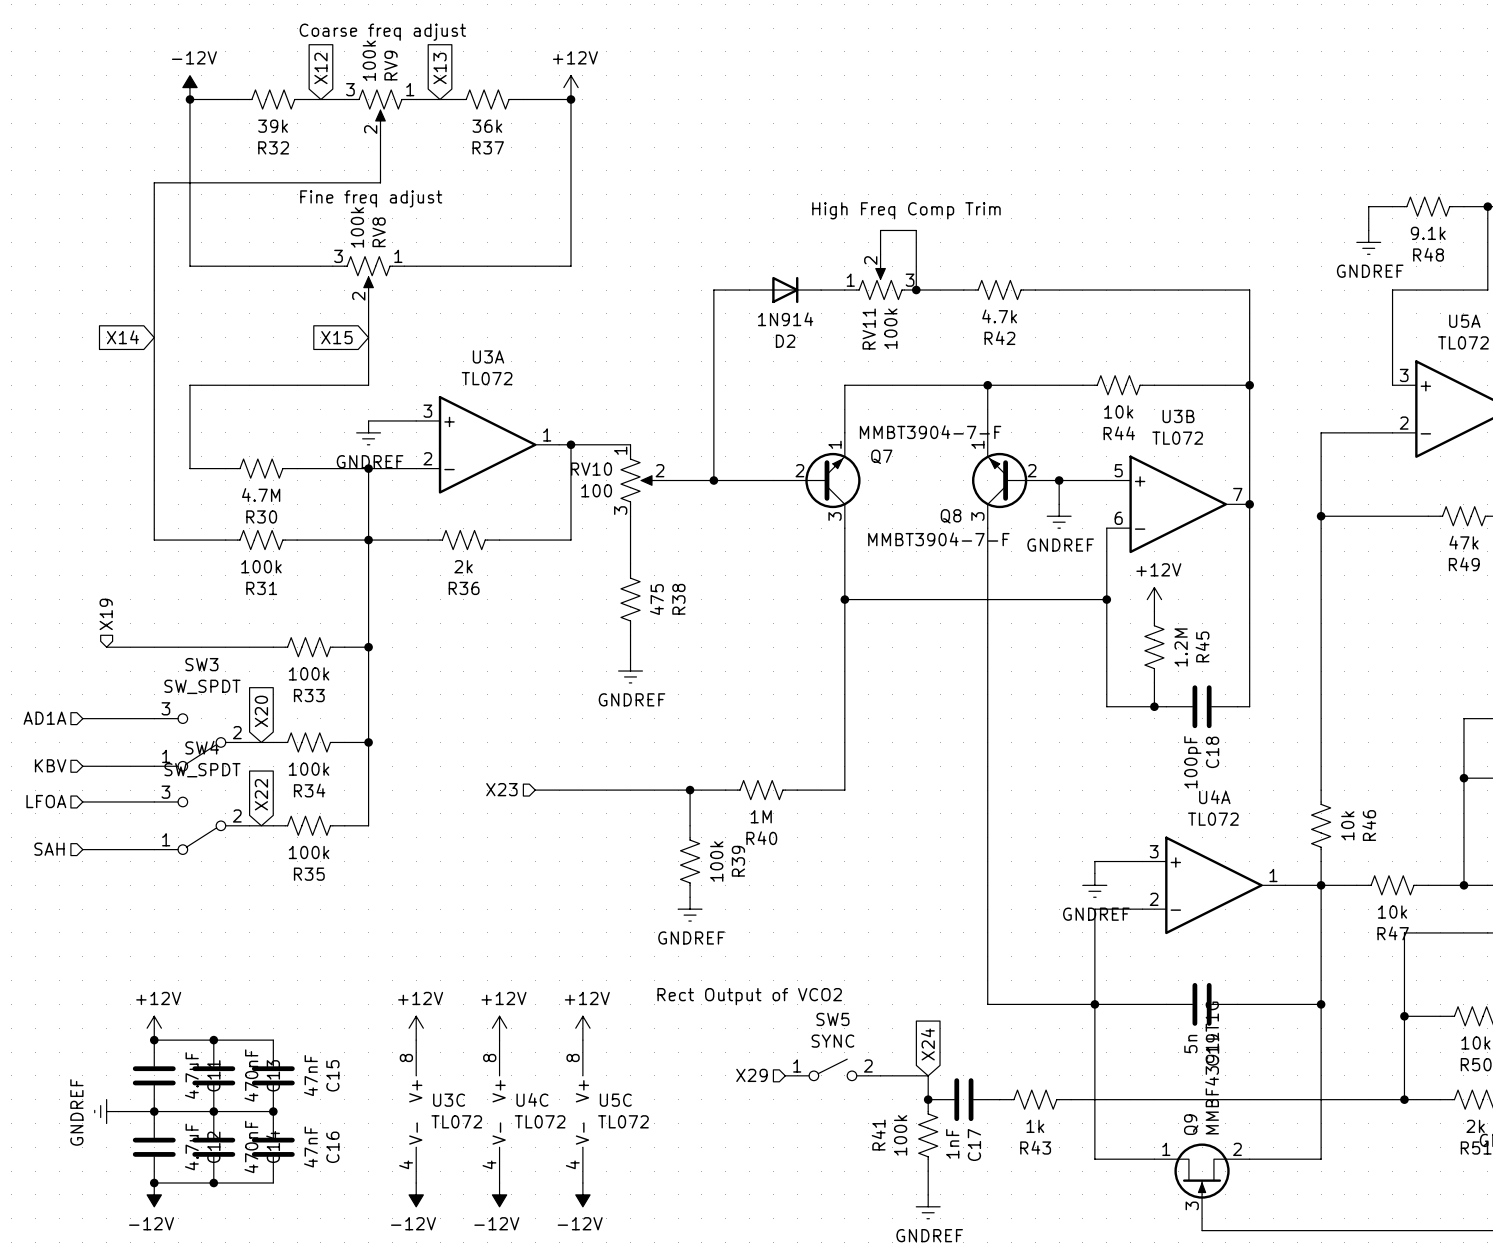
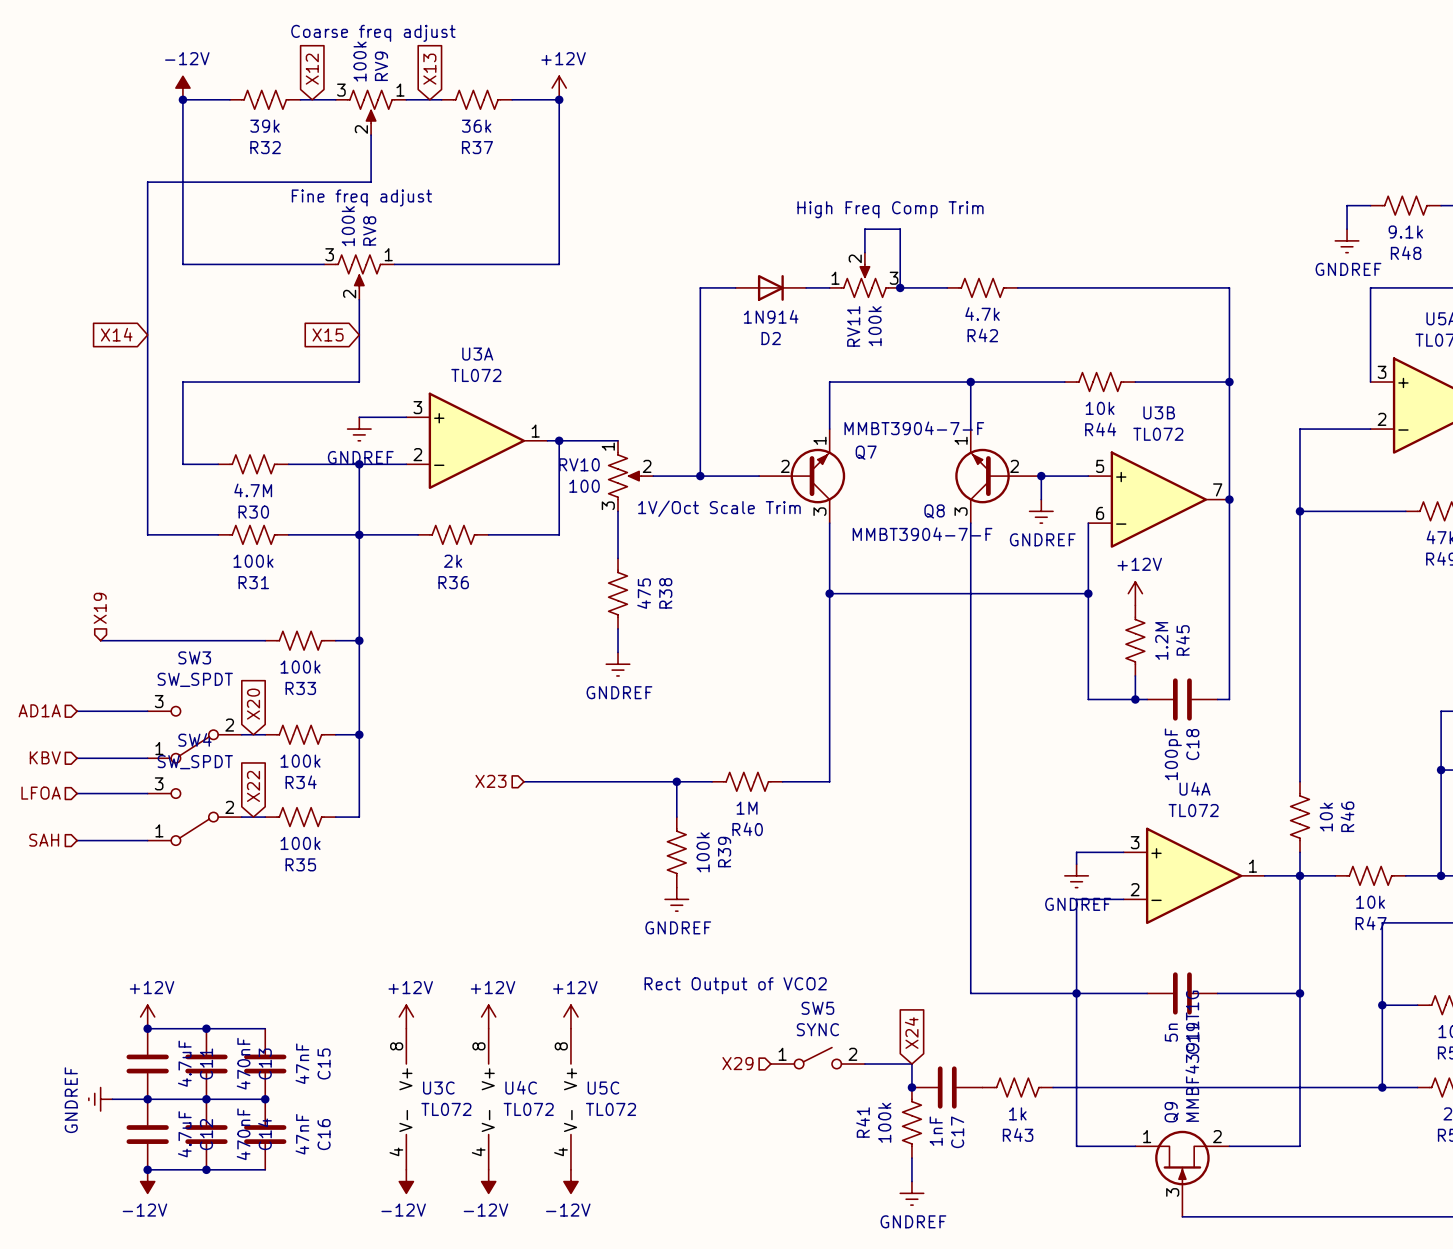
text: none -> 1V/Oct Scale Trim (719, 508)

